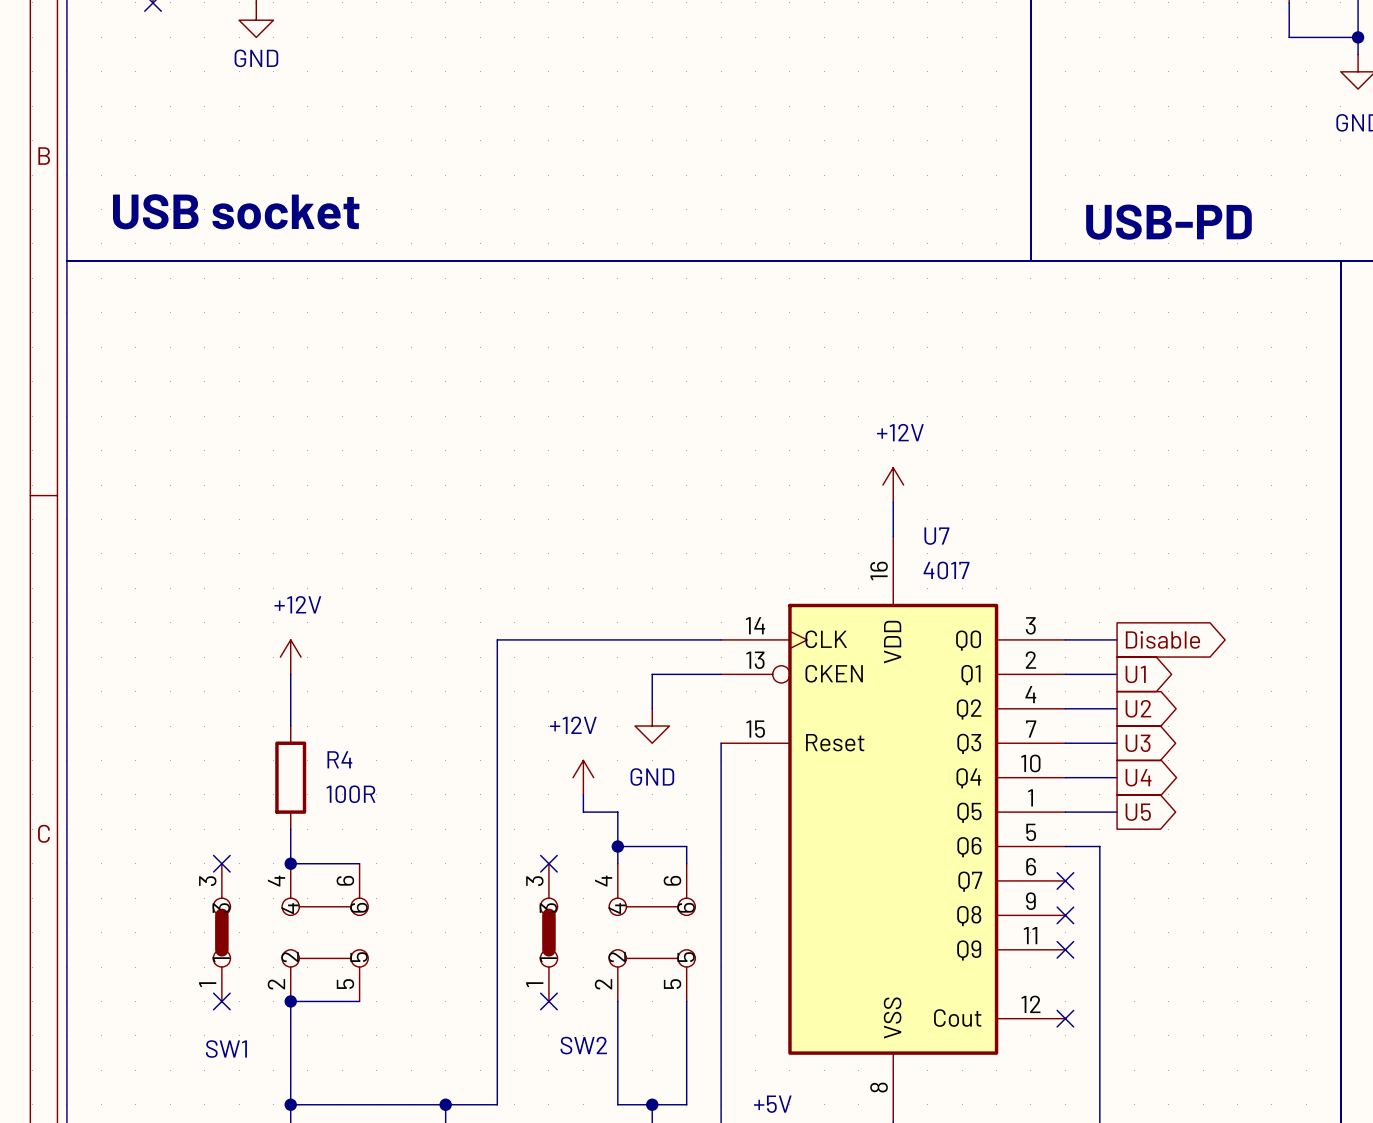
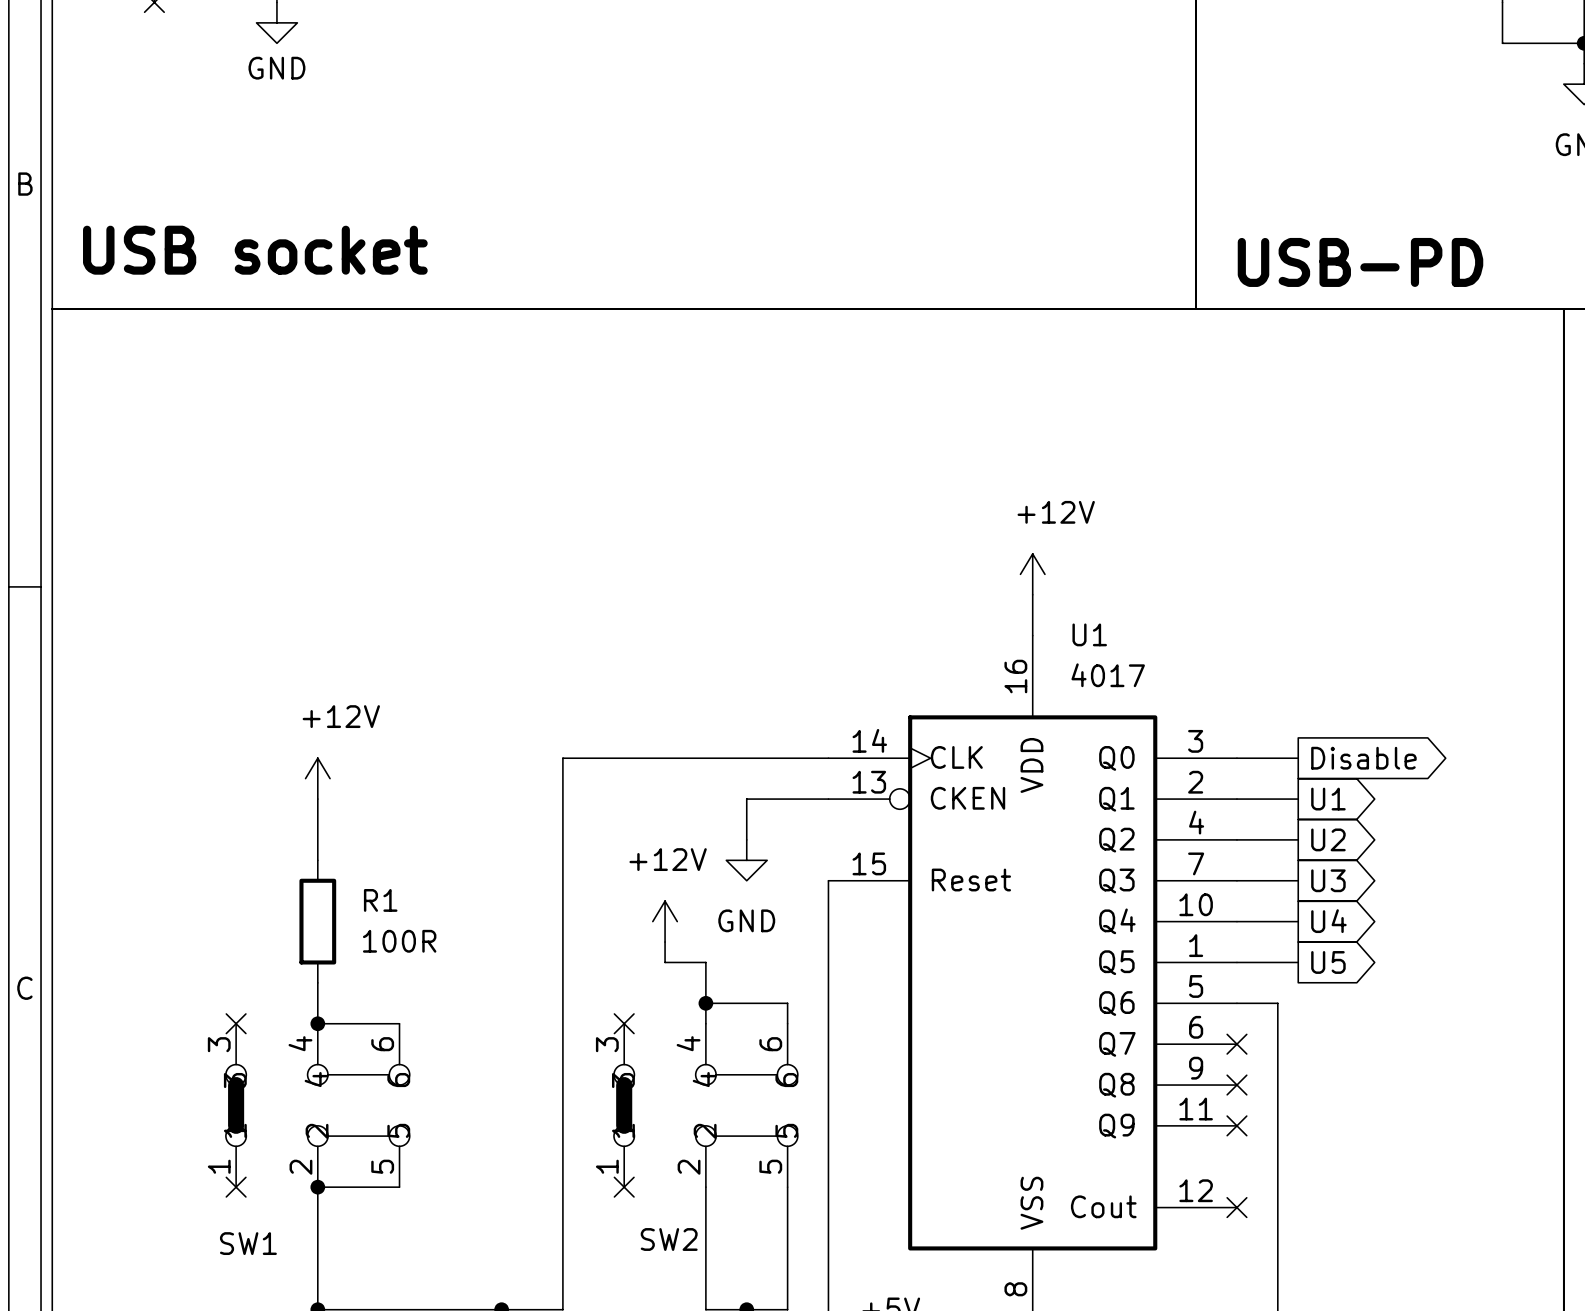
U7 name: U7 (936, 536) -> U1 (1089, 634)
R4 name: R4 (339, 759) -> R1 (380, 900)

